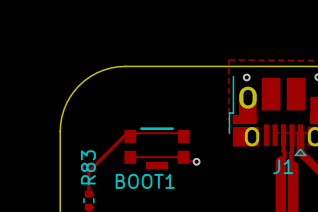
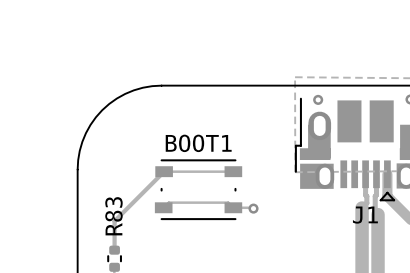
BOOT1 footprint: [124, 127, 190, 170] -> [154, 159, 243, 221]
BOOT1 name position: BOOT1 (145, 181) -> BOOT1 (198, 143)

